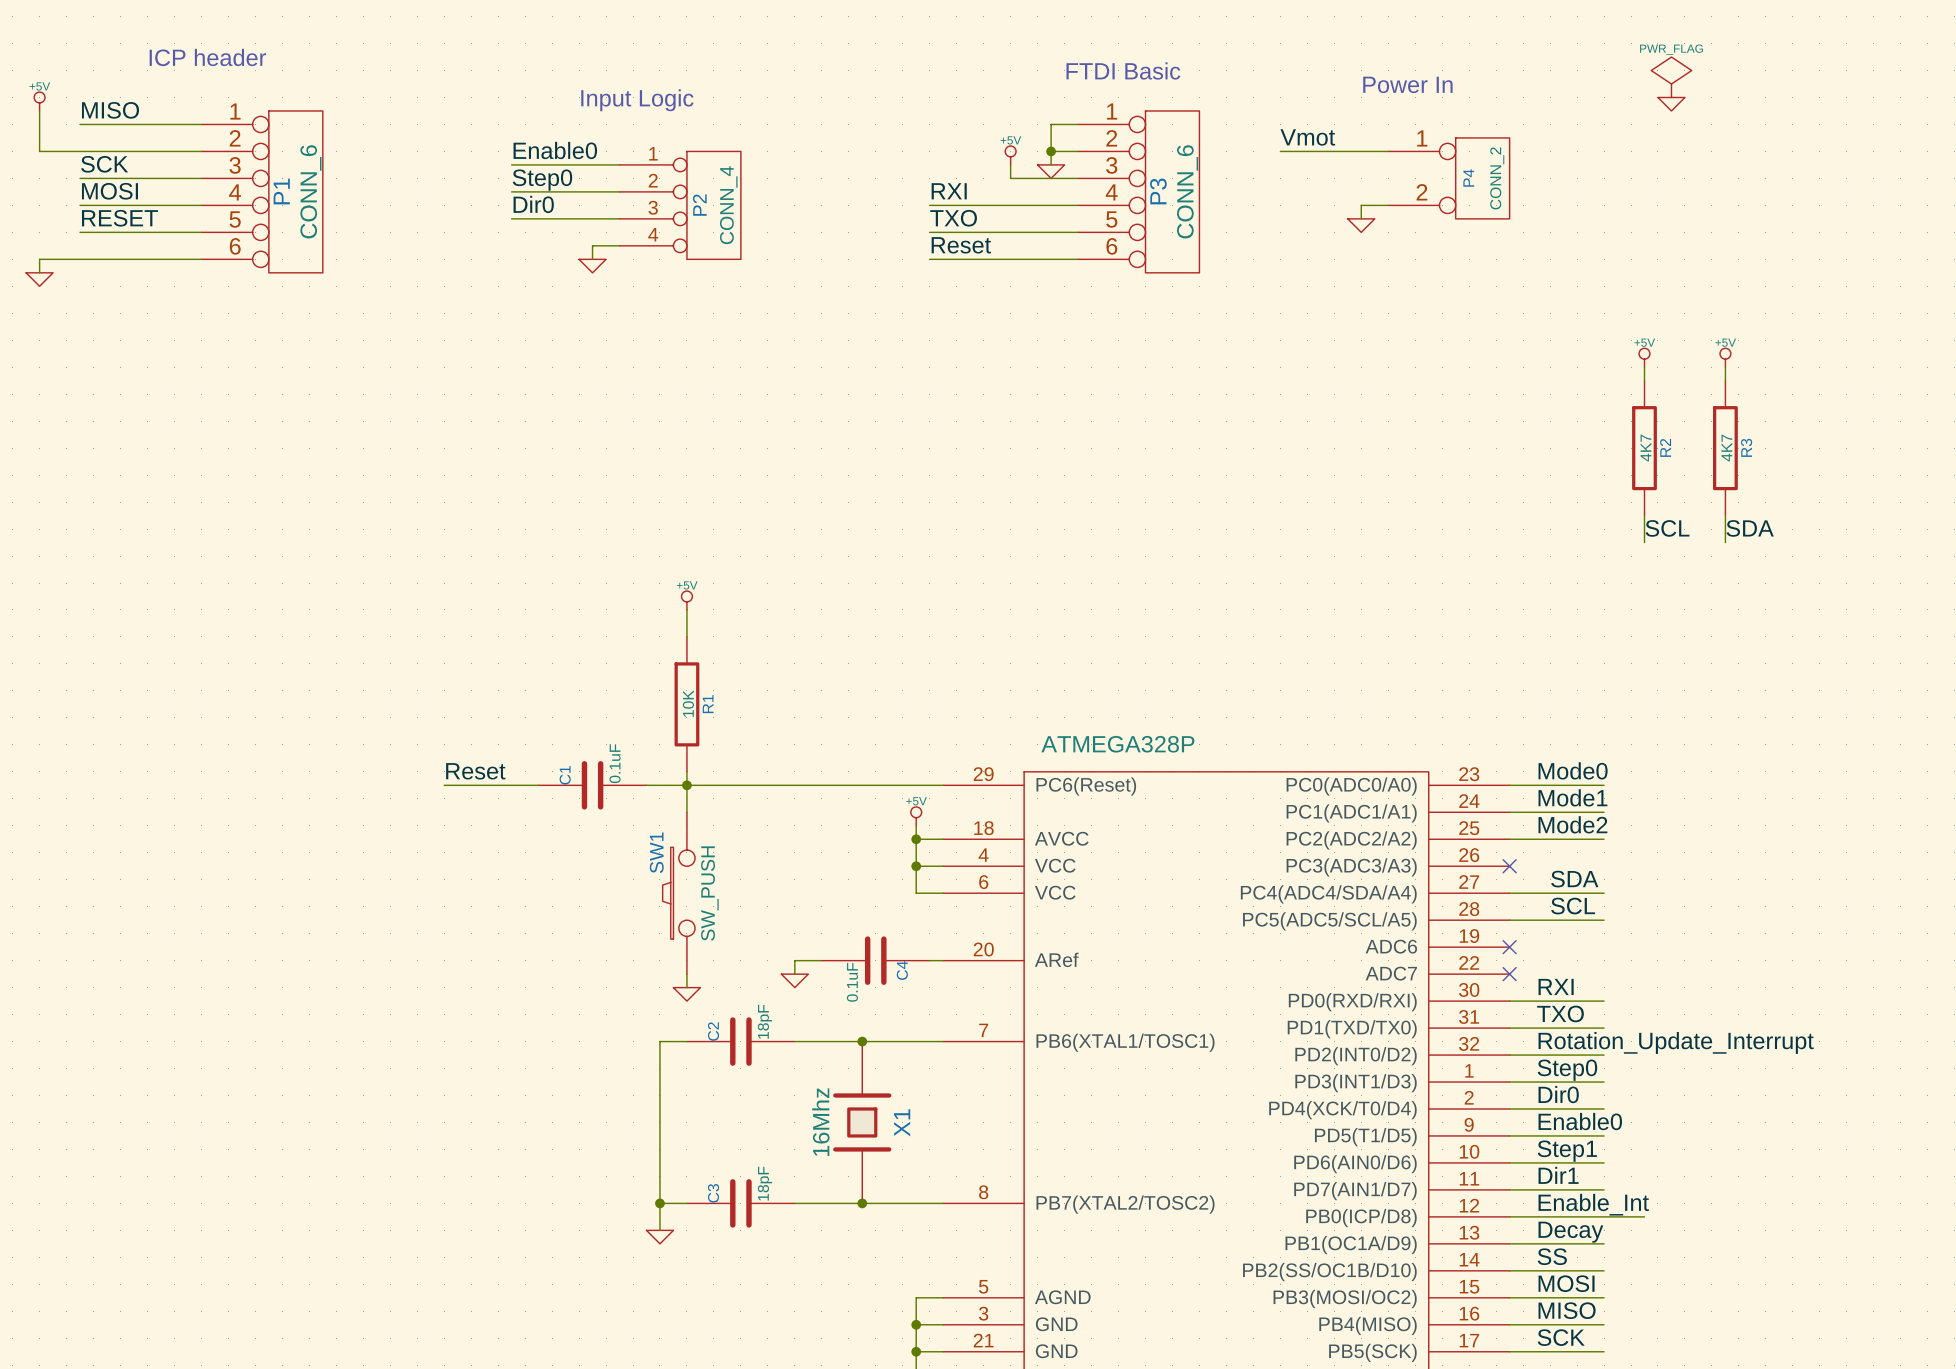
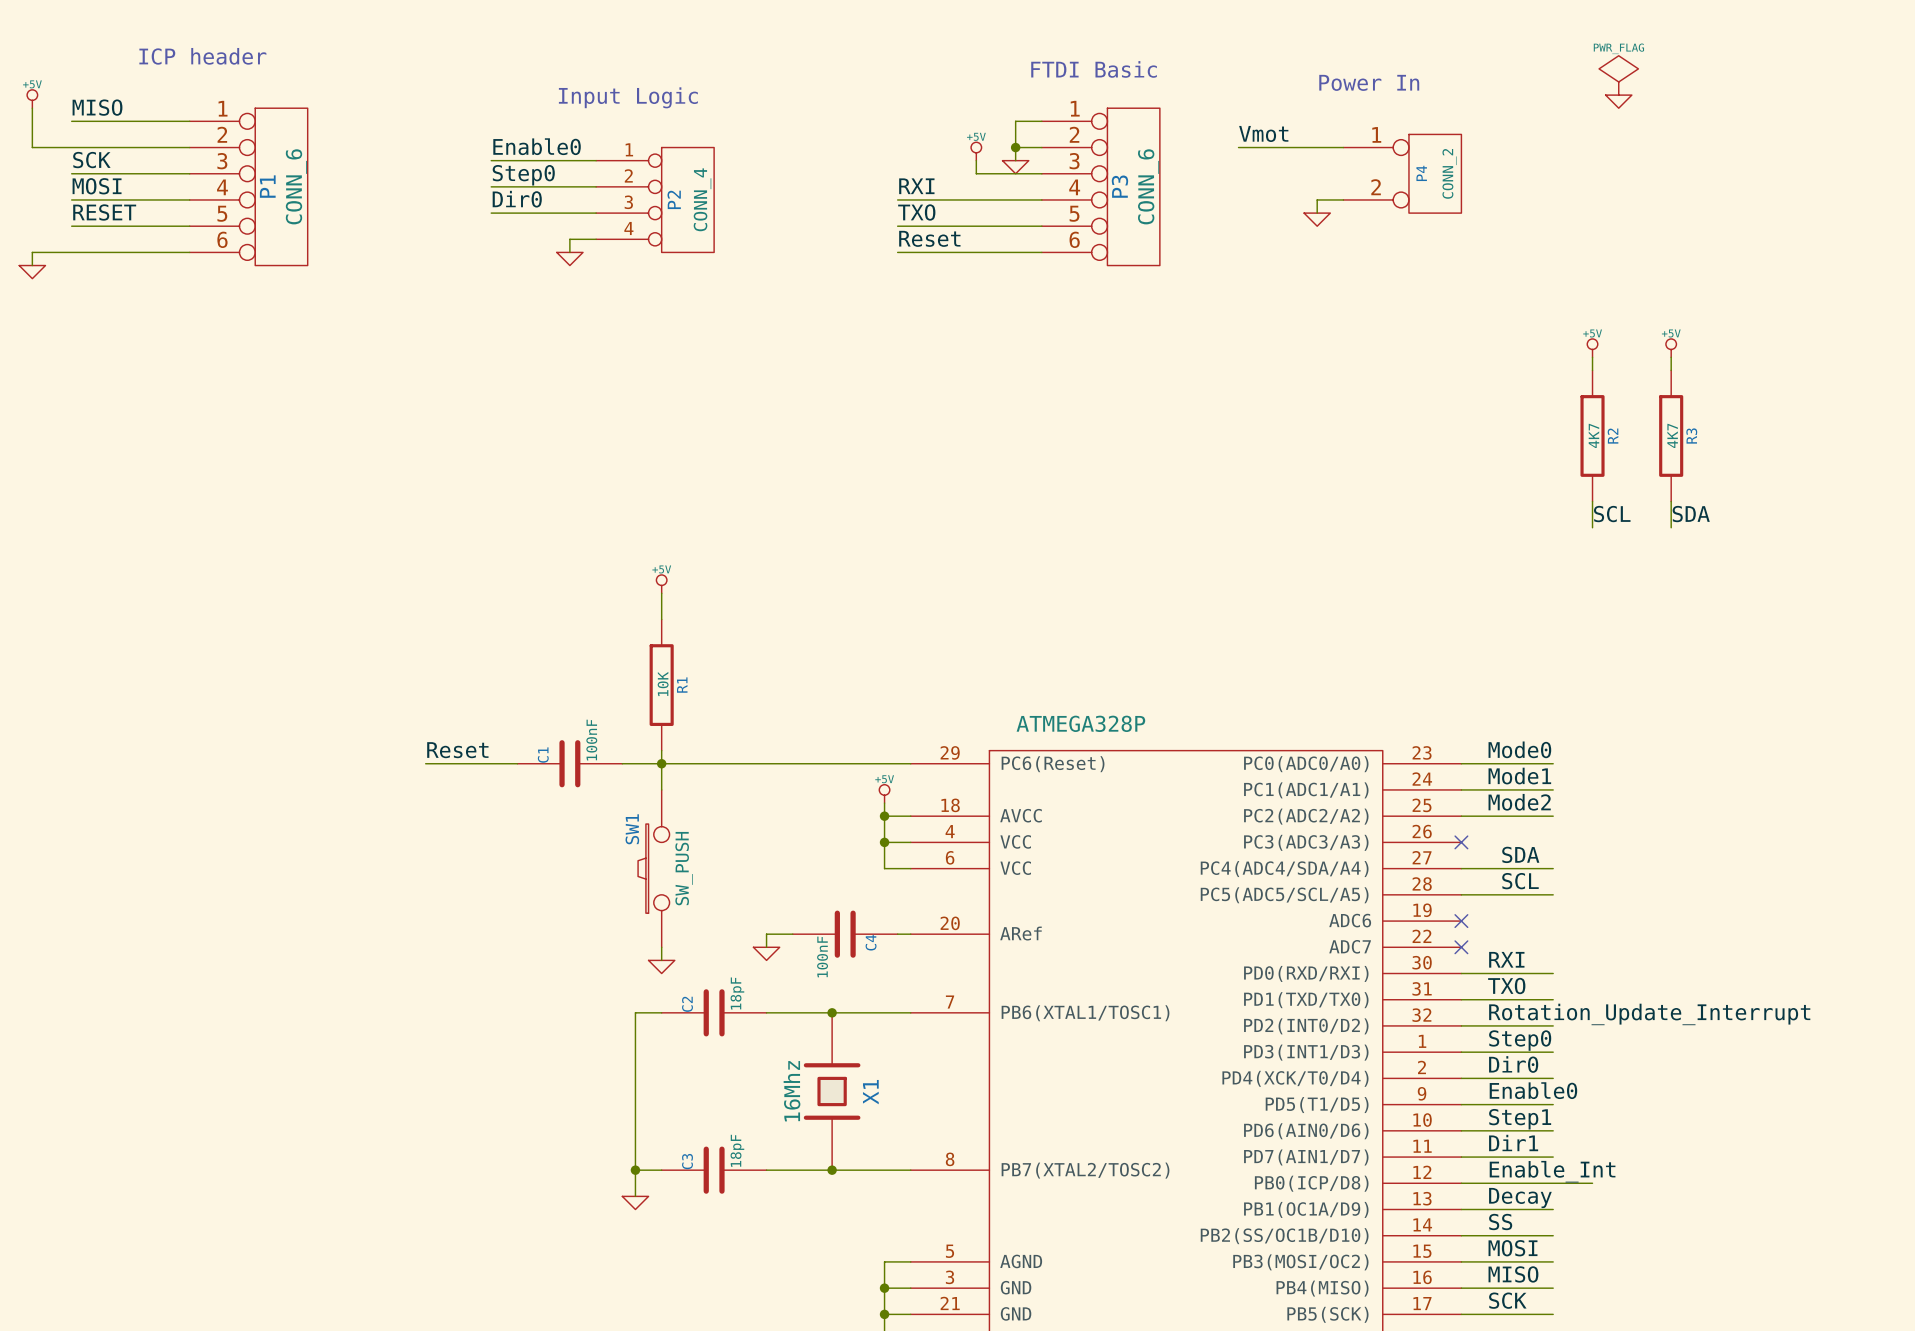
C1 value: 0.1uF (615, 763) -> 100nF (591, 740)
C4 value: 0.1uF (852, 982) -> 100nF (822, 956)

